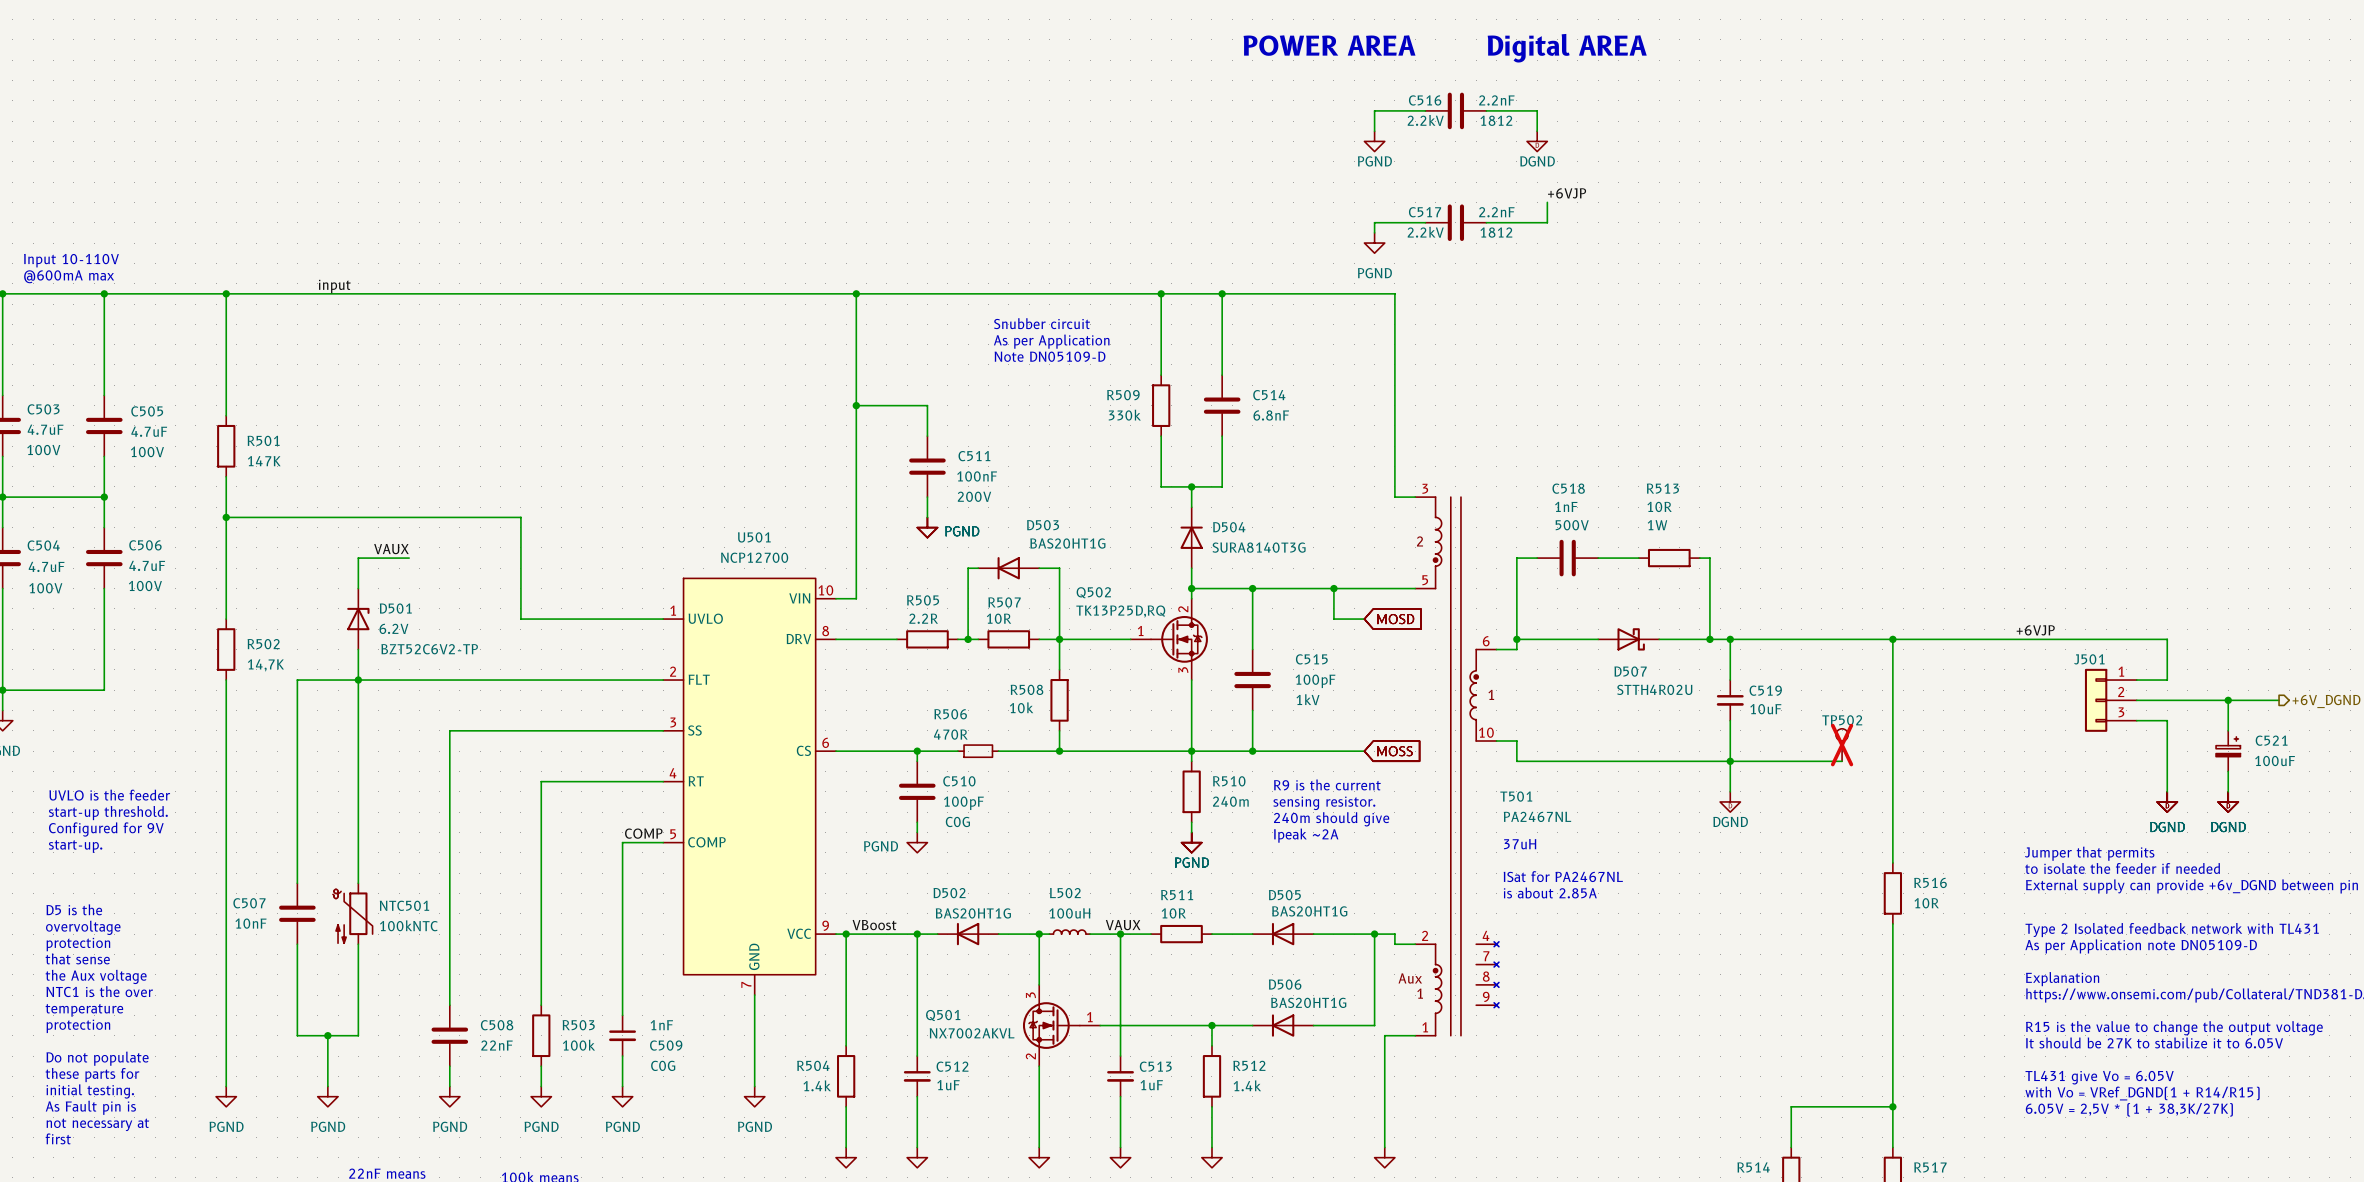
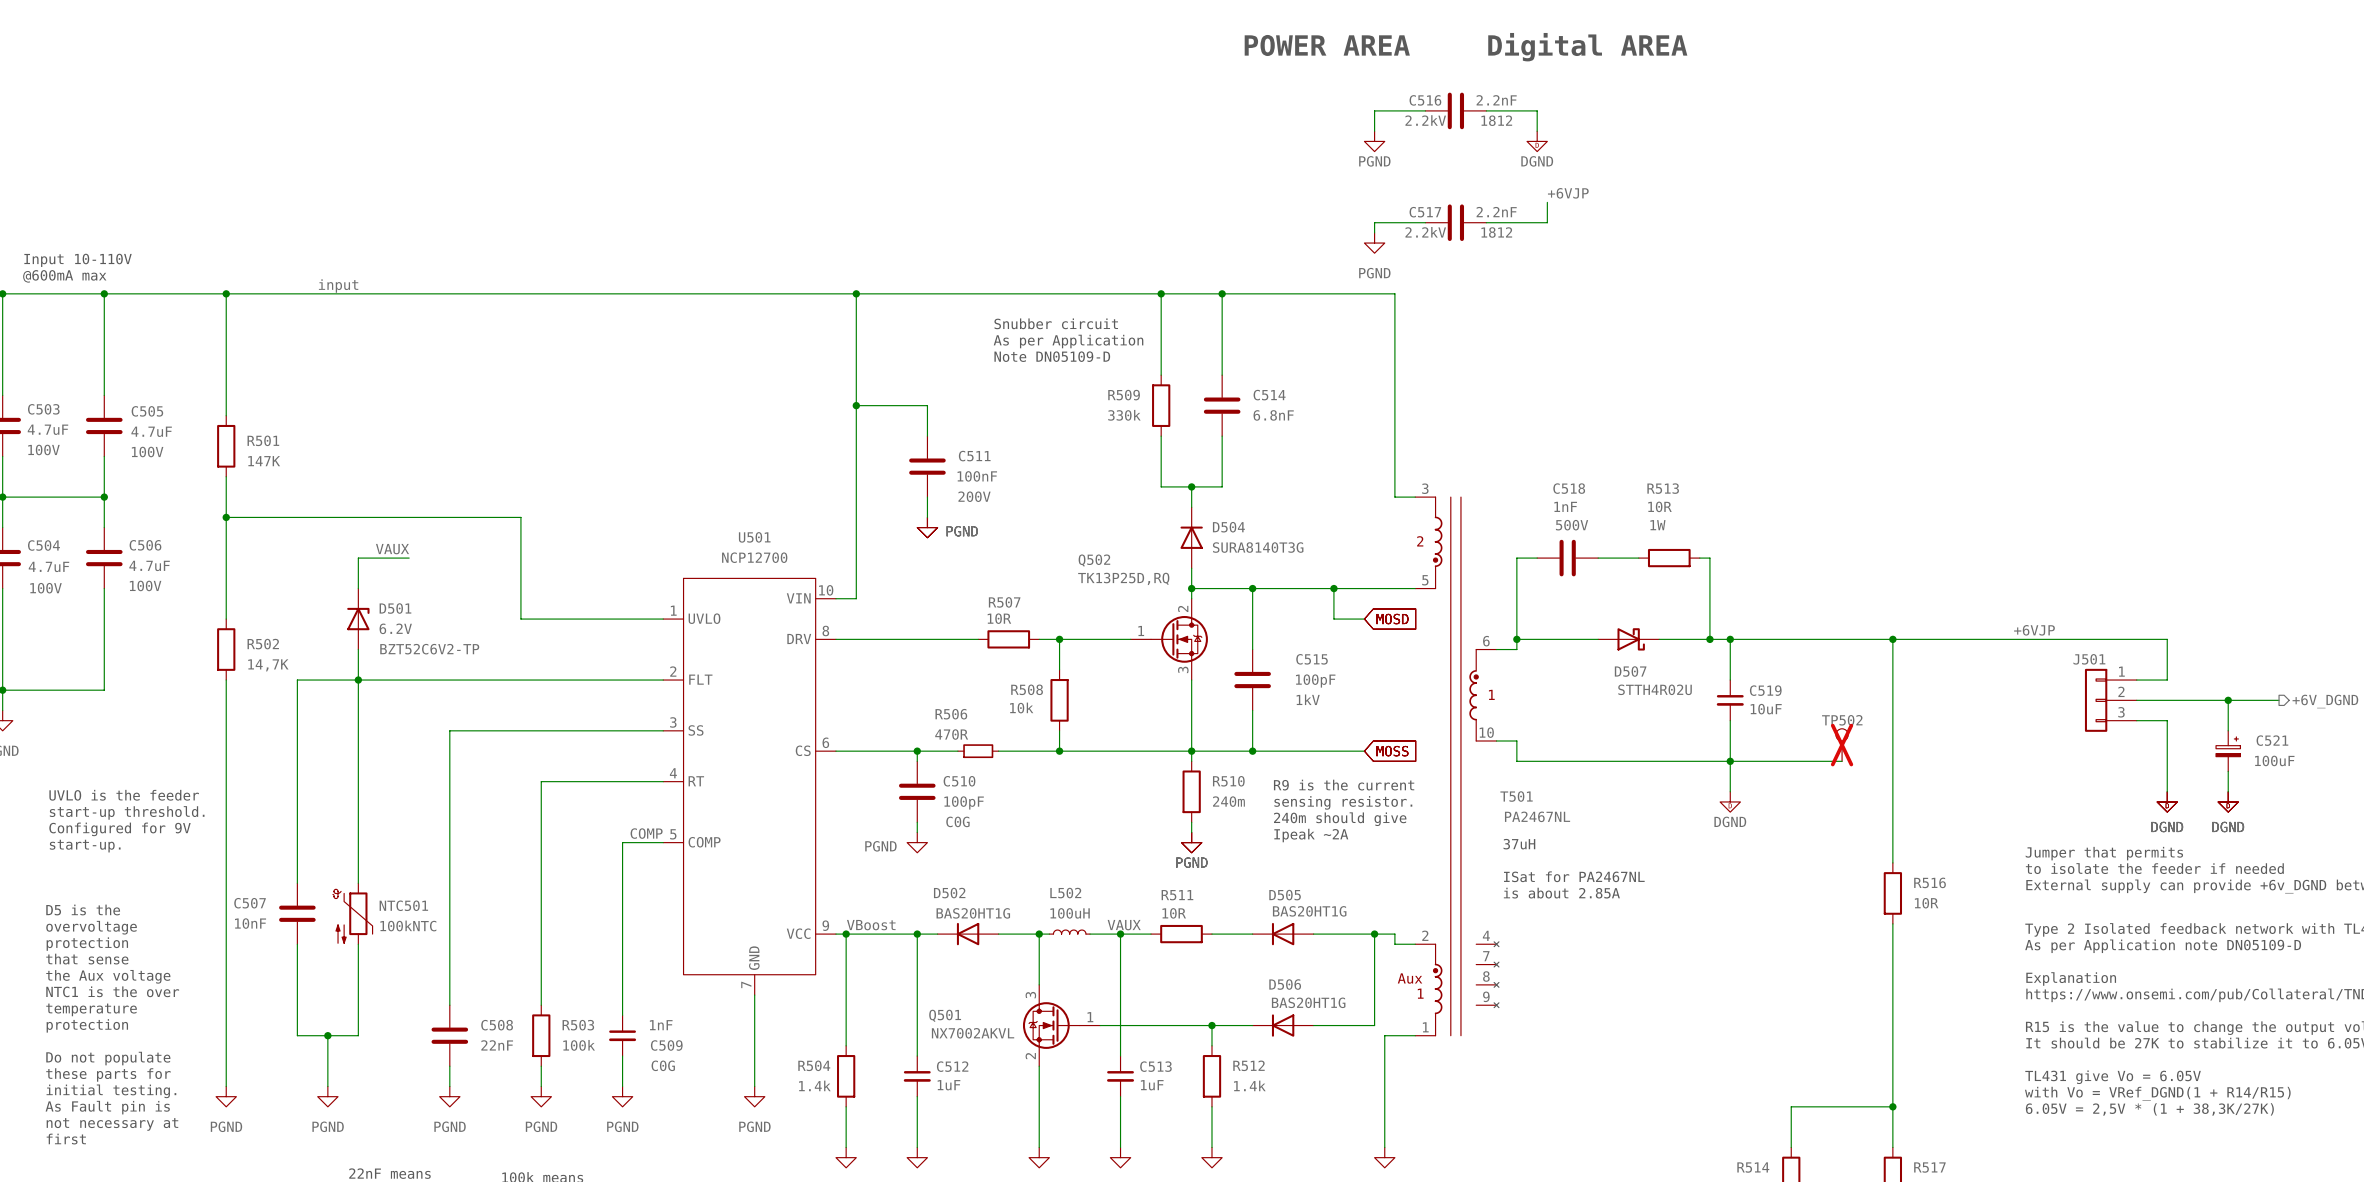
wire: (978, 568) (968, 568) (968, 639) -> none
D503: BAS20HT1G (1008, 568) -> none
wire: (1039, 568) (1059, 568) (1059, 639) -> none
Q502 name position: Q502 (1093, 592) -> Q502 (1094, 560)
Q502 value position: TK13P25D,RQ (1120, 611) -> TK13P25D,RQ (1123, 578)
wire: none -> (896, 639) (957, 639)
R505: 2.2R (927, 639) -> none
junction: (968, 639) -> none

